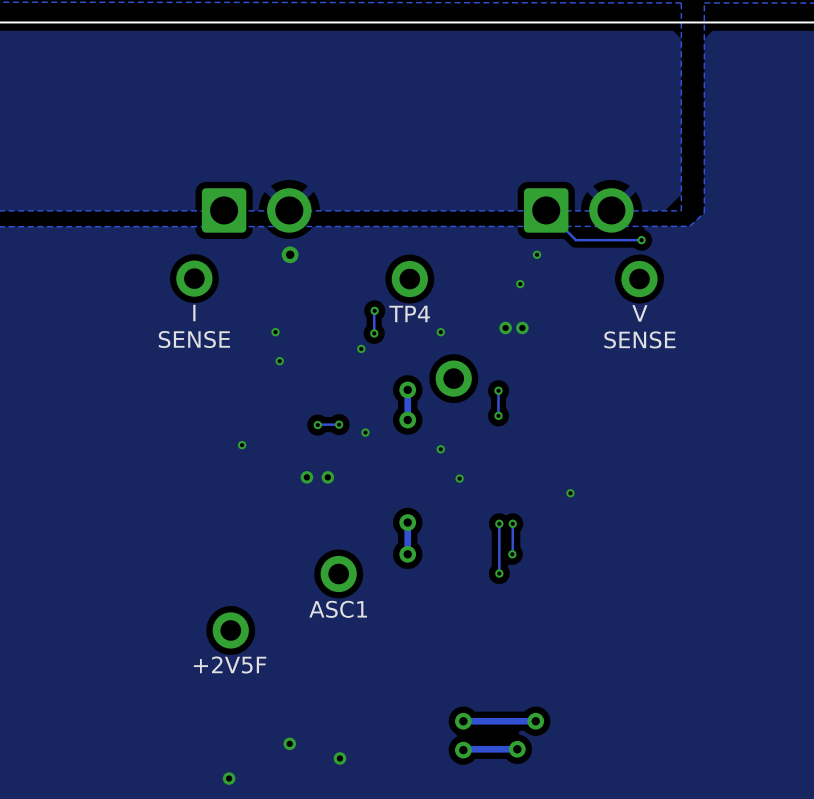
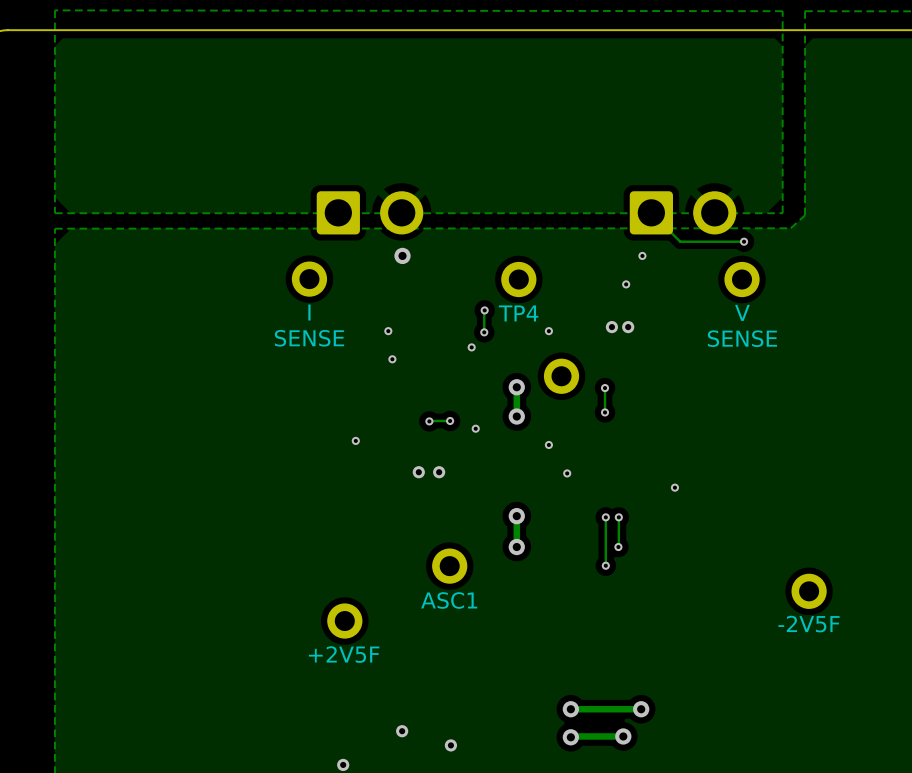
part: none -> (809, 591)
text: none -> -2V5F (809, 624)

